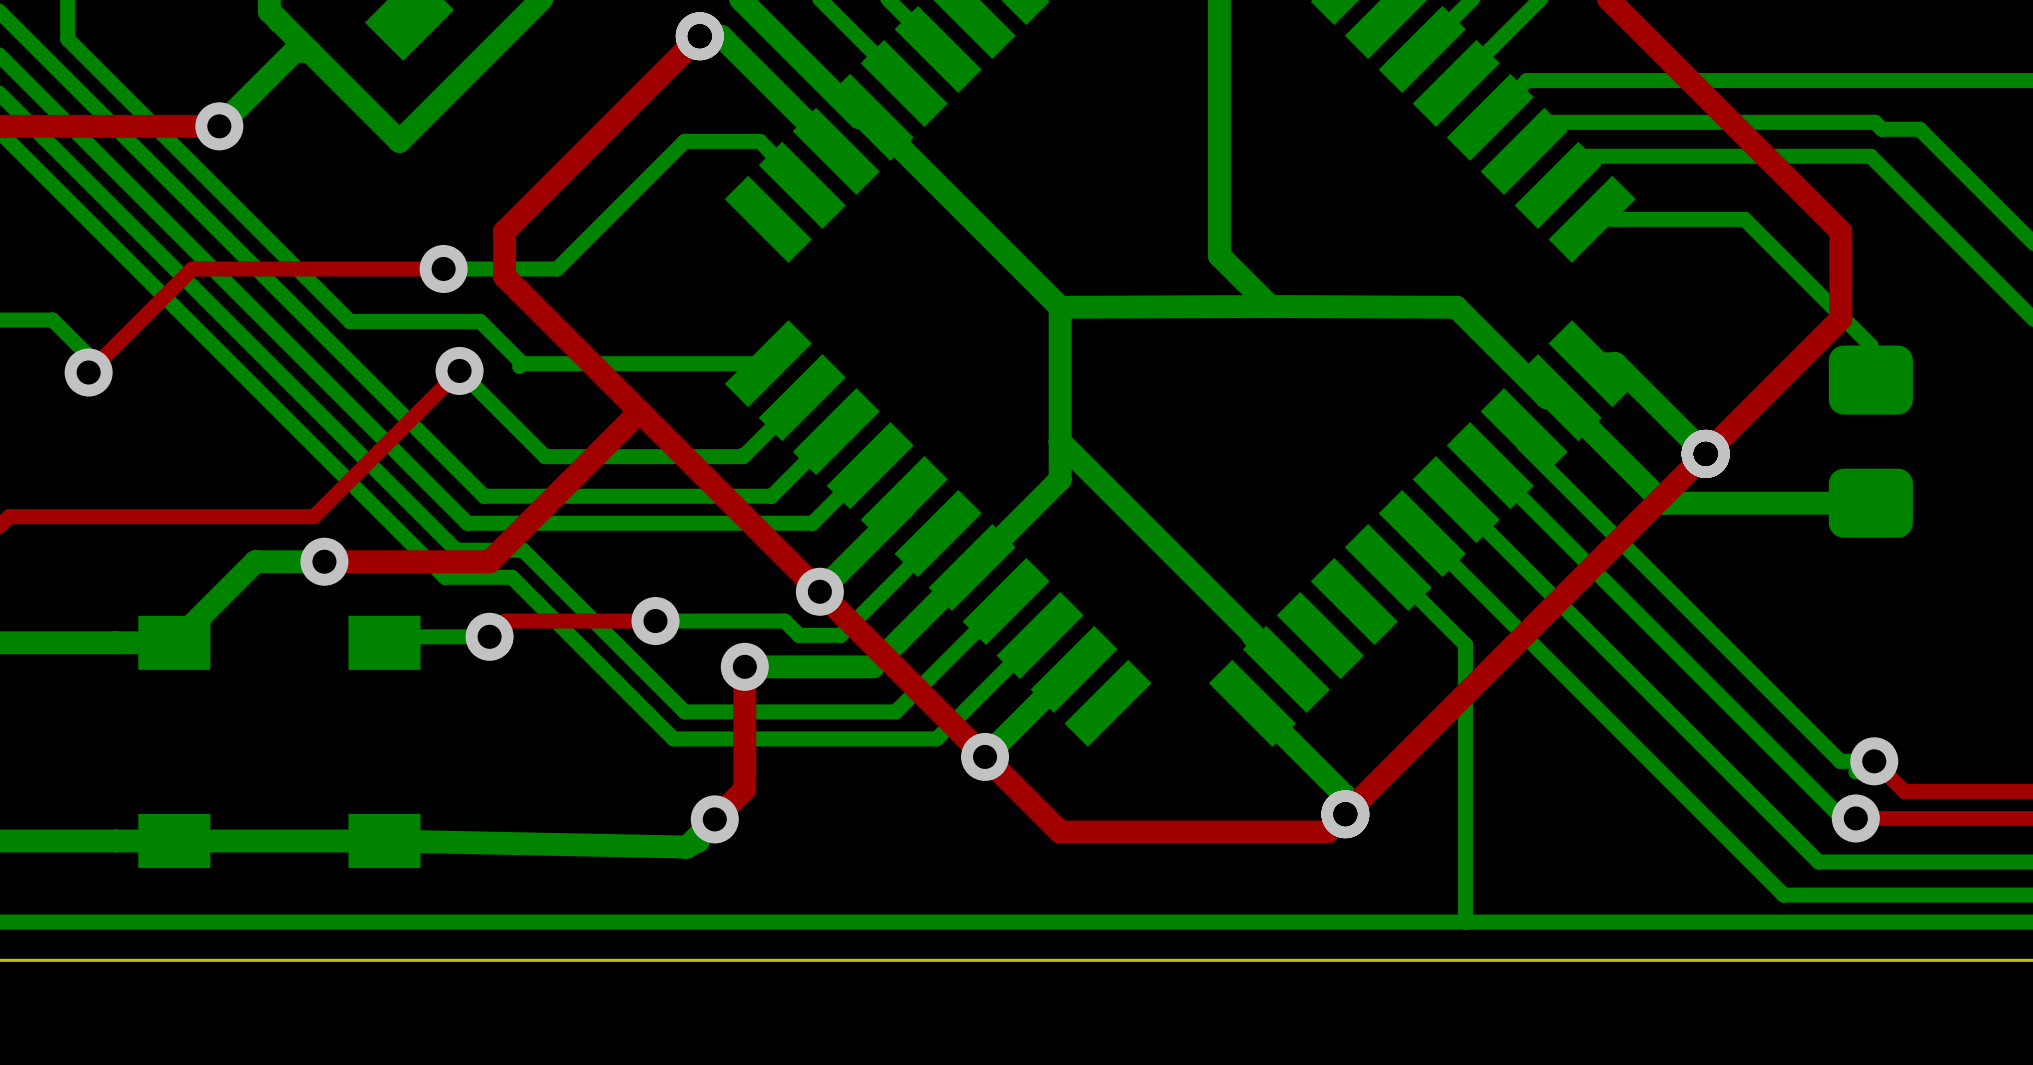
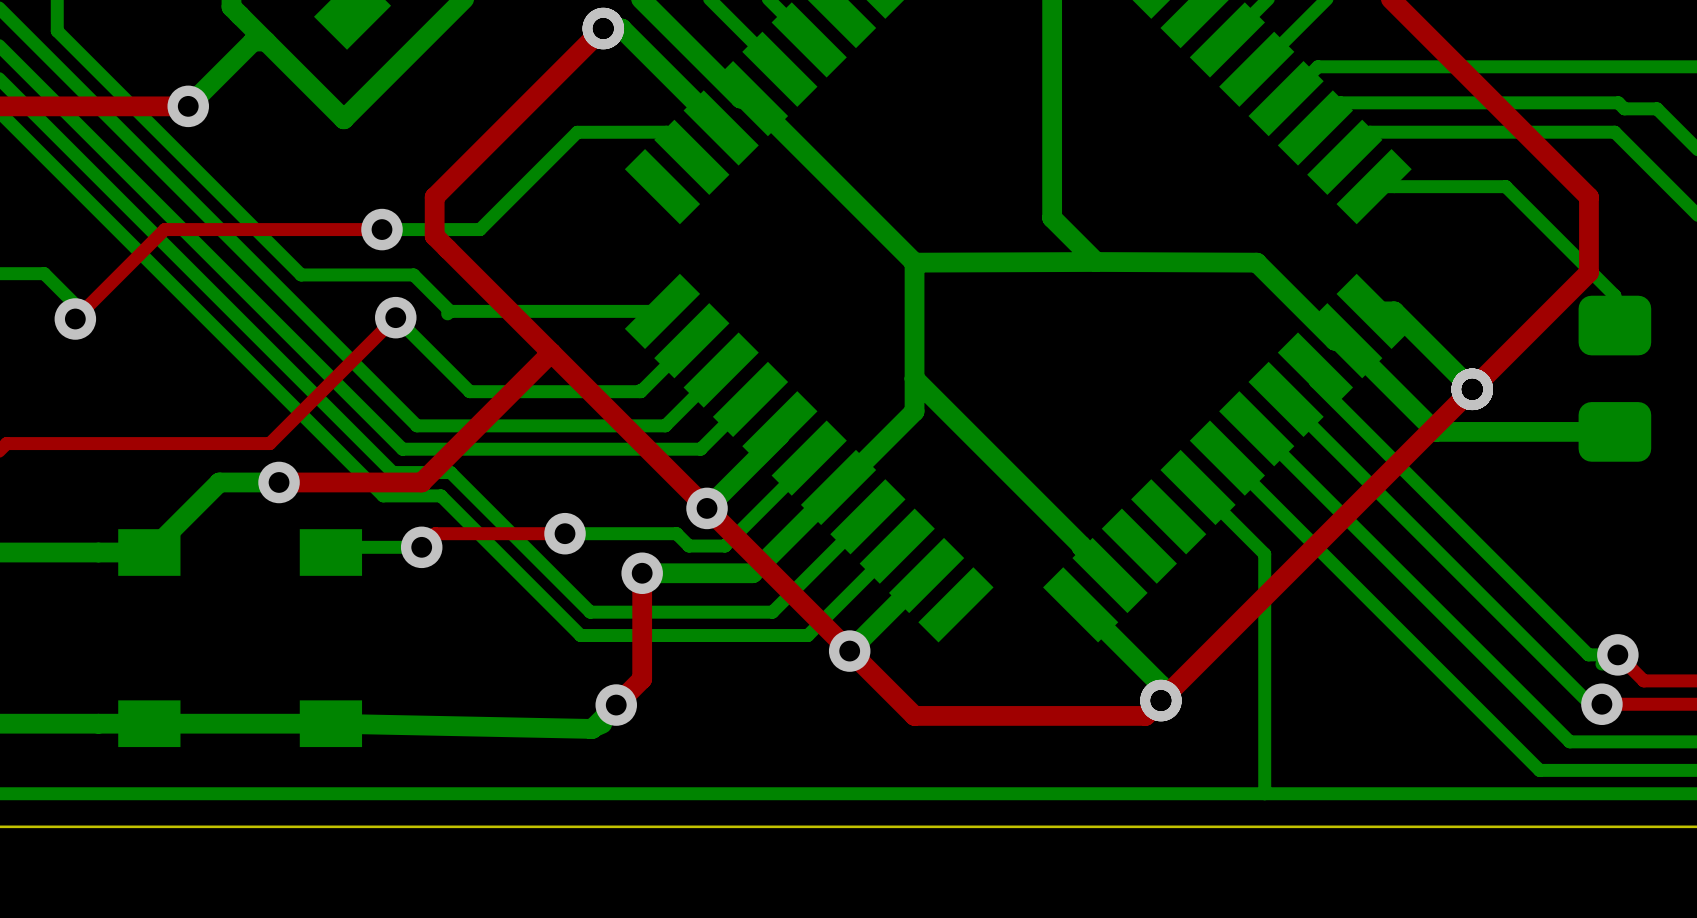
bottom track: (669, 156) (684, 141) (759, 141) (802, 185) -> (577, 132) (666, 132)

